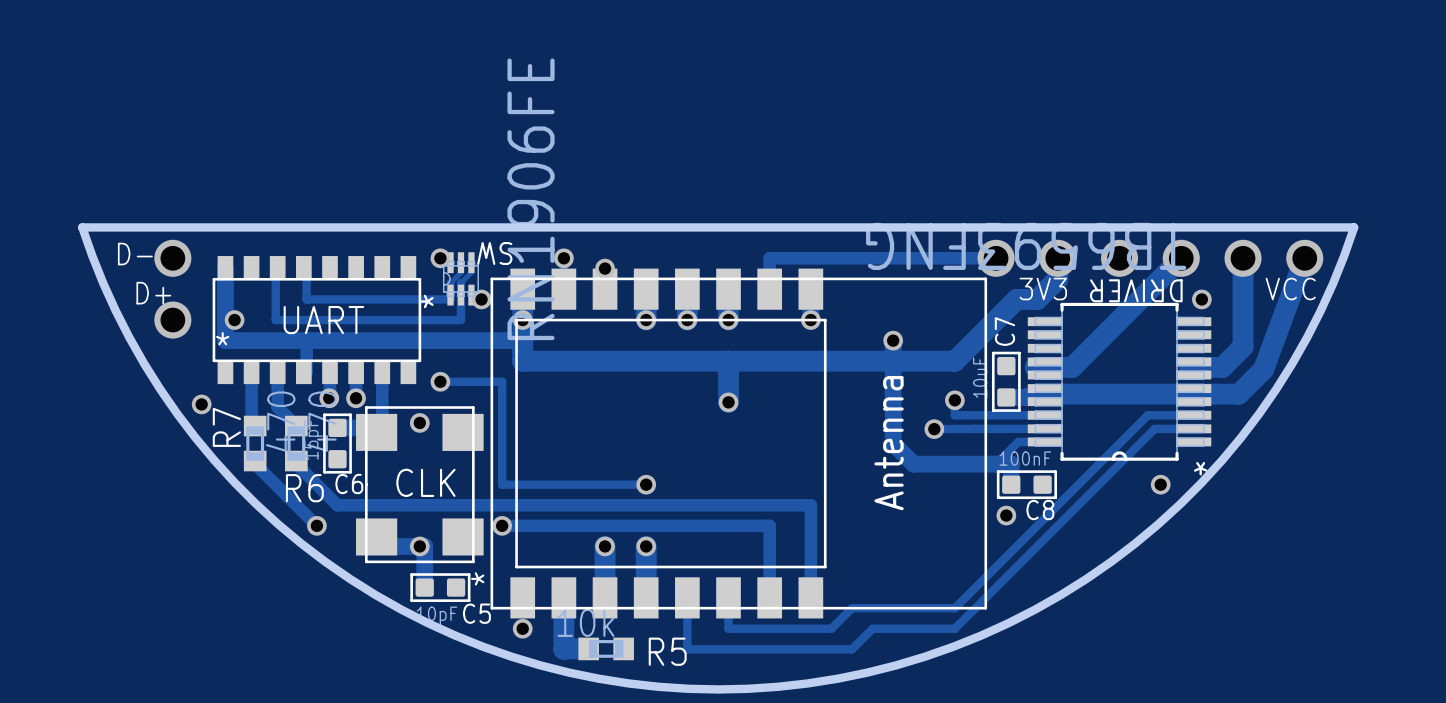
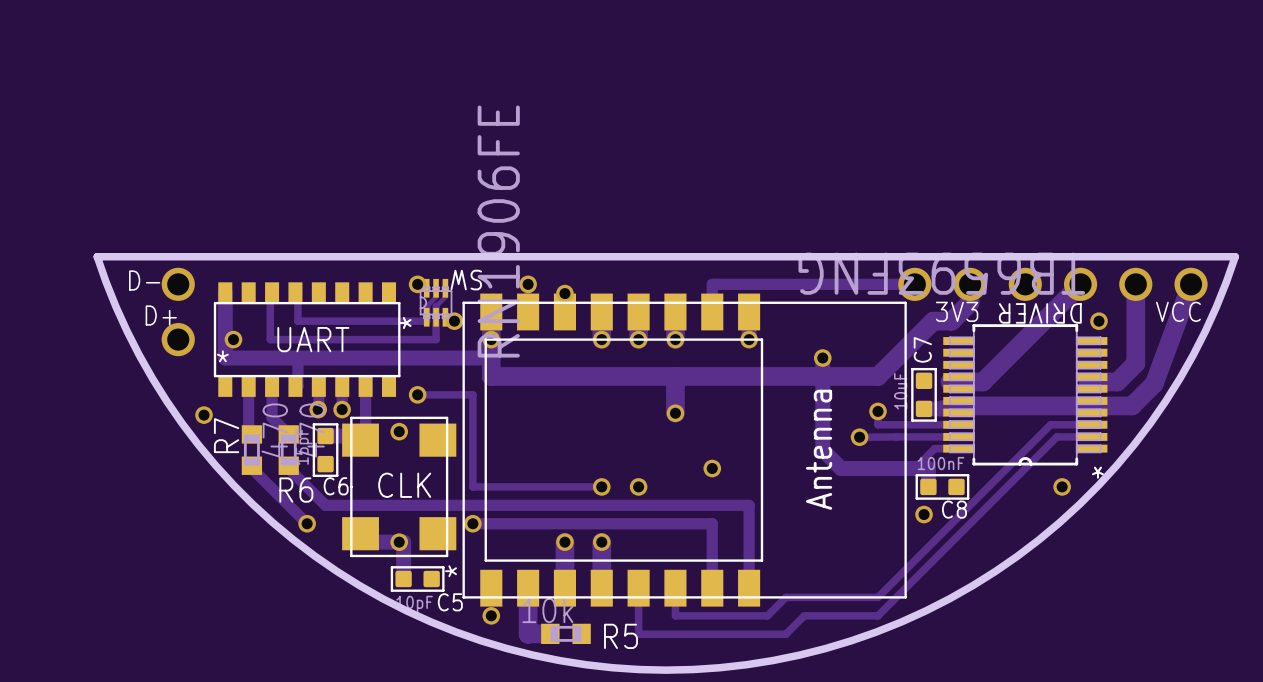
via: none -> (712, 468)
via: none -> (638, 486)

